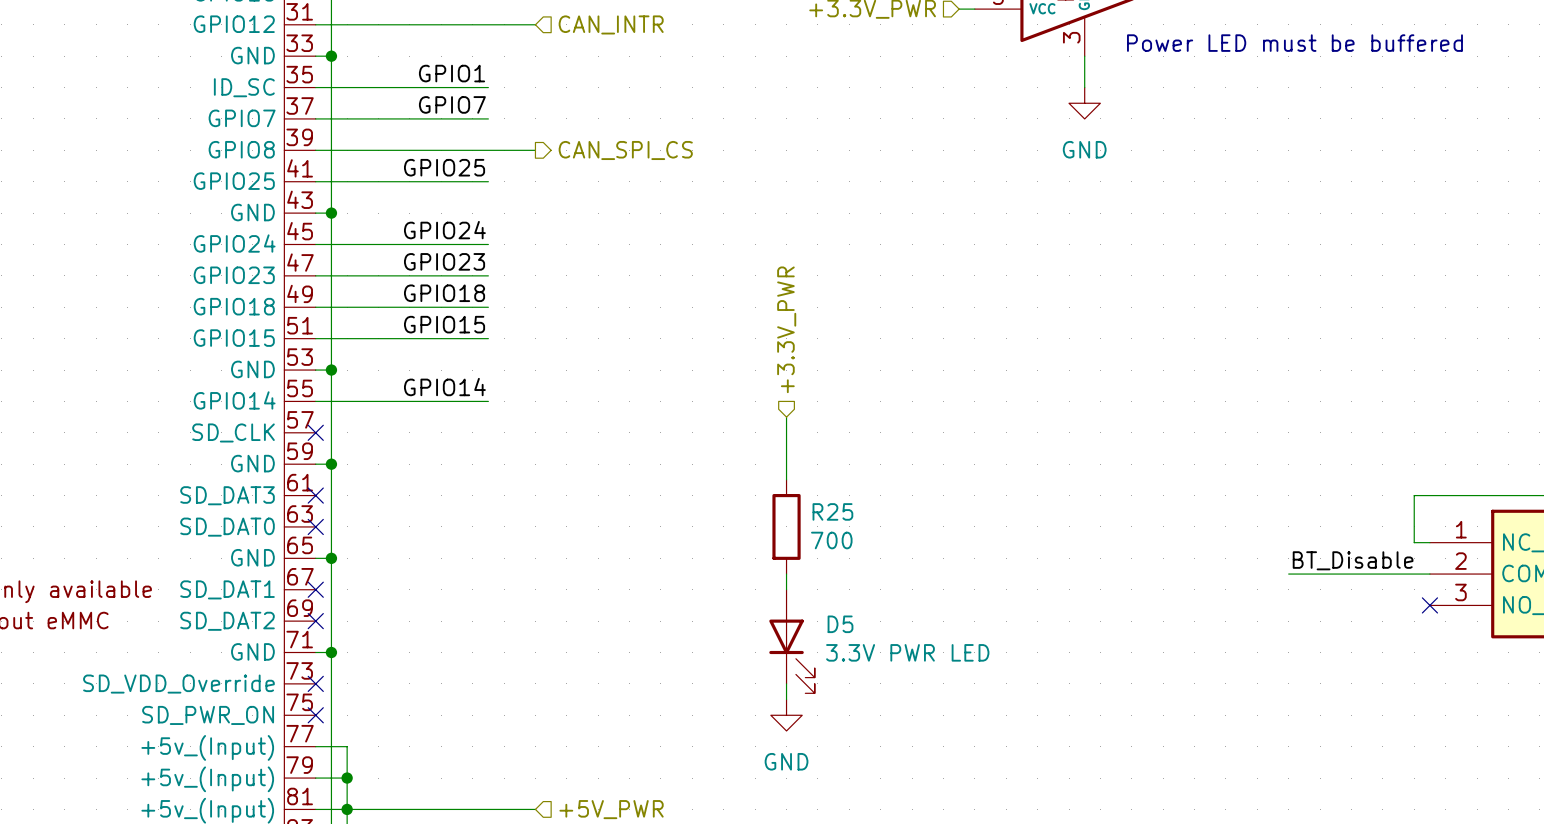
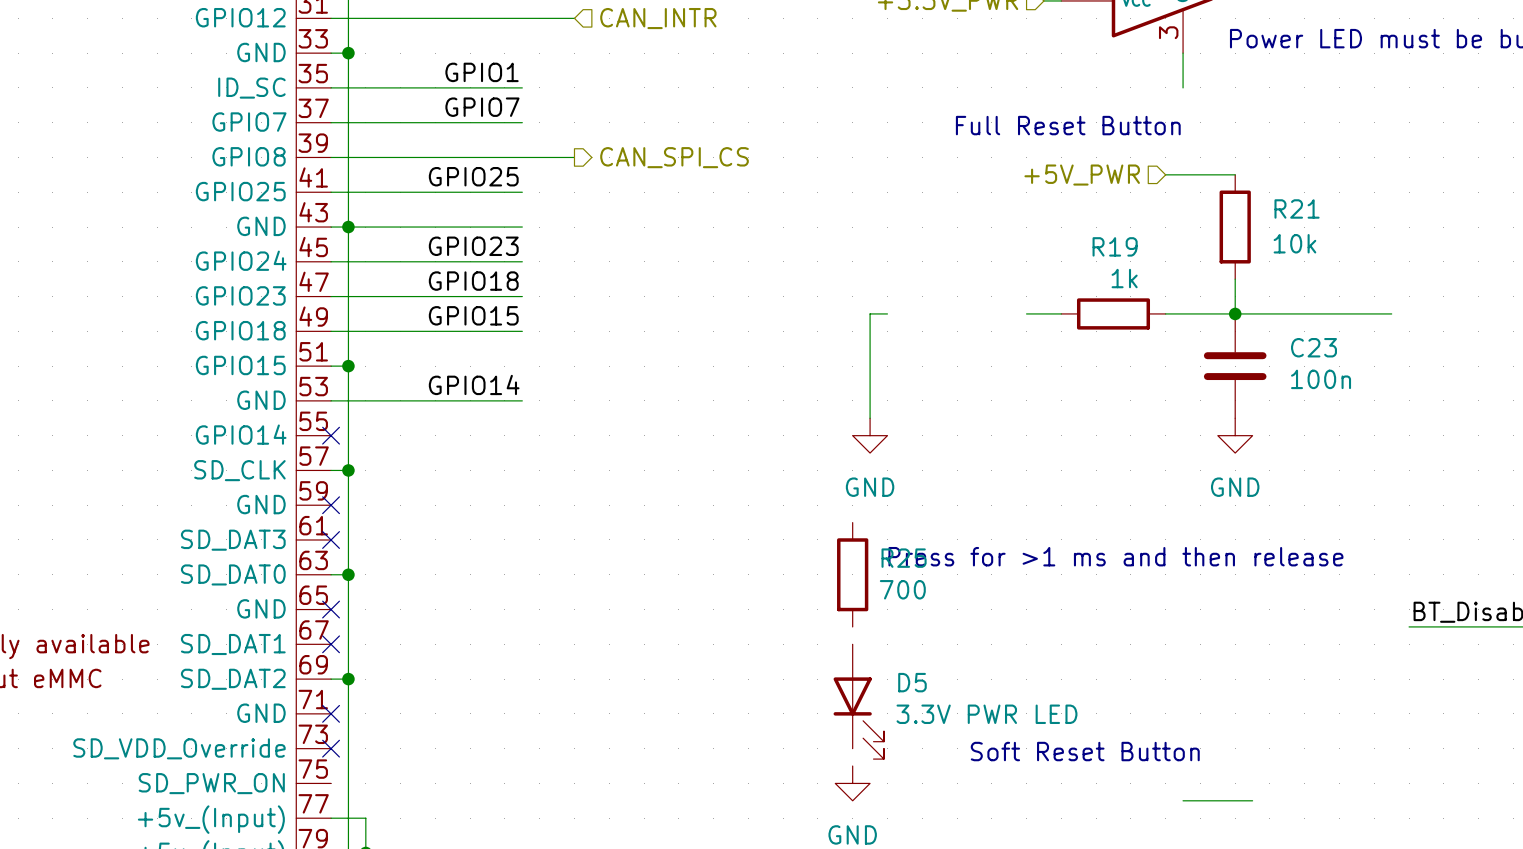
power symbol: GND (1084, 103) -> none
text: none -> Full Reset Button (1068, 125)
hierarchical label: none -> +5V_PWR (1082, 175)
wire: none -> (1165, 174) (1235, 174)
R21: none -> 10k (1235, 227)
label: GPIO24 (444, 230) -> GPIO23 (473, 246)
wire: none -> (1235, 279) (1235, 313)
label: GPIO23 (444, 261) -> GPIO18 (473, 281)
wire: none -> (887, 313) (870, 313) (870, 418)
wire: none -> (1026, 313) (1061, 313)
R19: none -> 1k (1113, 313)
wire: none -> (1165, 313) (1391, 313)
junction: none -> (1235, 313)
label: GPIO18 (444, 293) -> GPIO15 (473, 315)
label: GPIO15 (444, 324) -> none
hierarchical label: +3.3V_PWR (786, 329) -> none
wire: (331, 338) (488, 338) -> (348, 227) (522, 227)
junction: none -> (348, 366)
C23: none -> 100n (1235, 366)
wire: none -> (348, 400) (522, 400)
junction: (331, 370) -> none
label position: GPIO14 (444, 387) -> GPIO14 (474, 384)
wire: (315, 401) (488, 401) -> none
no-connect mark: none -> (331, 435)
power symbol: none -> GND (870, 435)
power symbol: none -> GND (1235, 435)
wire: (786, 417) (786, 479) -> none
no-connect mark: (315, 432) -> none
junction: none -> (348, 470)
wire: (315, 464) (331, 464) -> (331, 470) (348, 470)
no-connect mark: none -> (331, 505)
junction: (331, 464) -> none
text: none -> Press for >1 ms and then release (1115, 556)
no-connect mark: (315, 526) -> none
junction: none -> (348, 574)
wire: (315, 558) (331, 558) -> (331, 574) (348, 574)
no-connect mark: none -> (331, 609)
junction: (331, 558) -> none
wire: (786, 574) (786, 589) -> none
no-connect mark: (315, 621) -> none
junction: none -> (348, 679)
wire: (315, 652) (331, 652) -> (331, 679) (348, 679)
no-connect mark: none -> (331, 713)
junction: (331, 652) -> none
wire: (786, 683) (786, 699) -> none
text: none -> Soft Reset Button (1085, 751)
no-connect mark: (315, 715) -> none
wire: none -> (1183, 800) (1252, 800)

